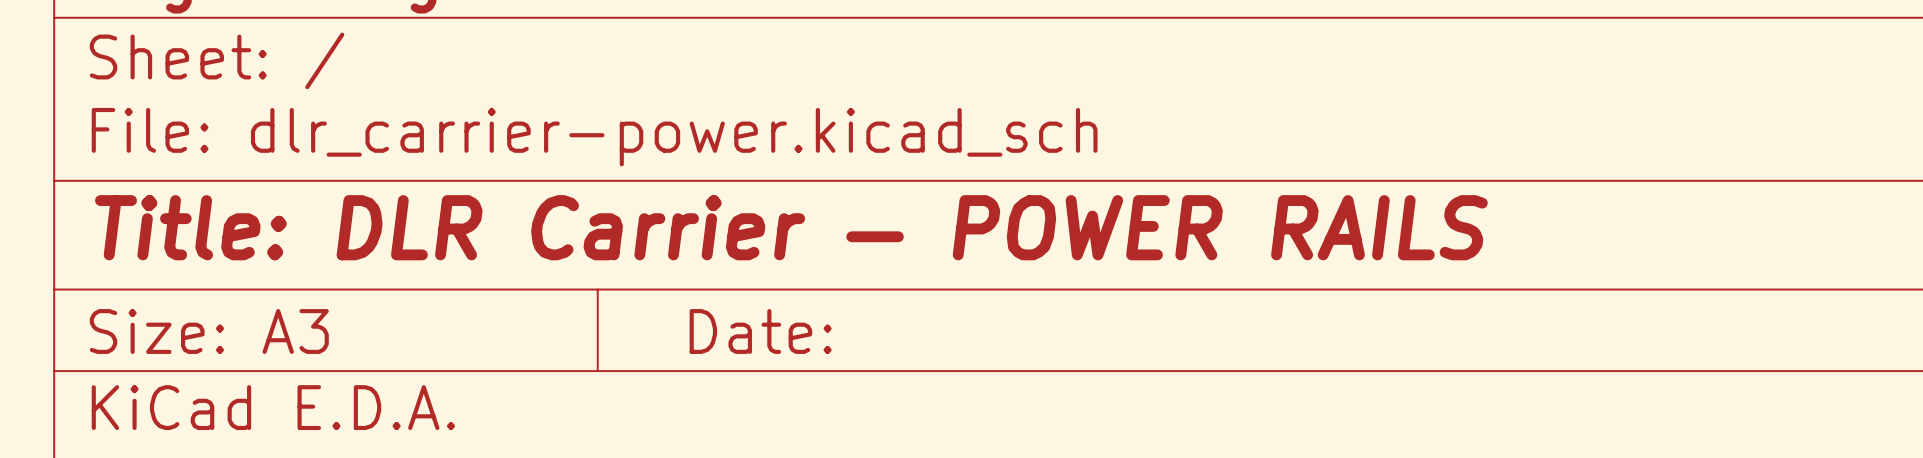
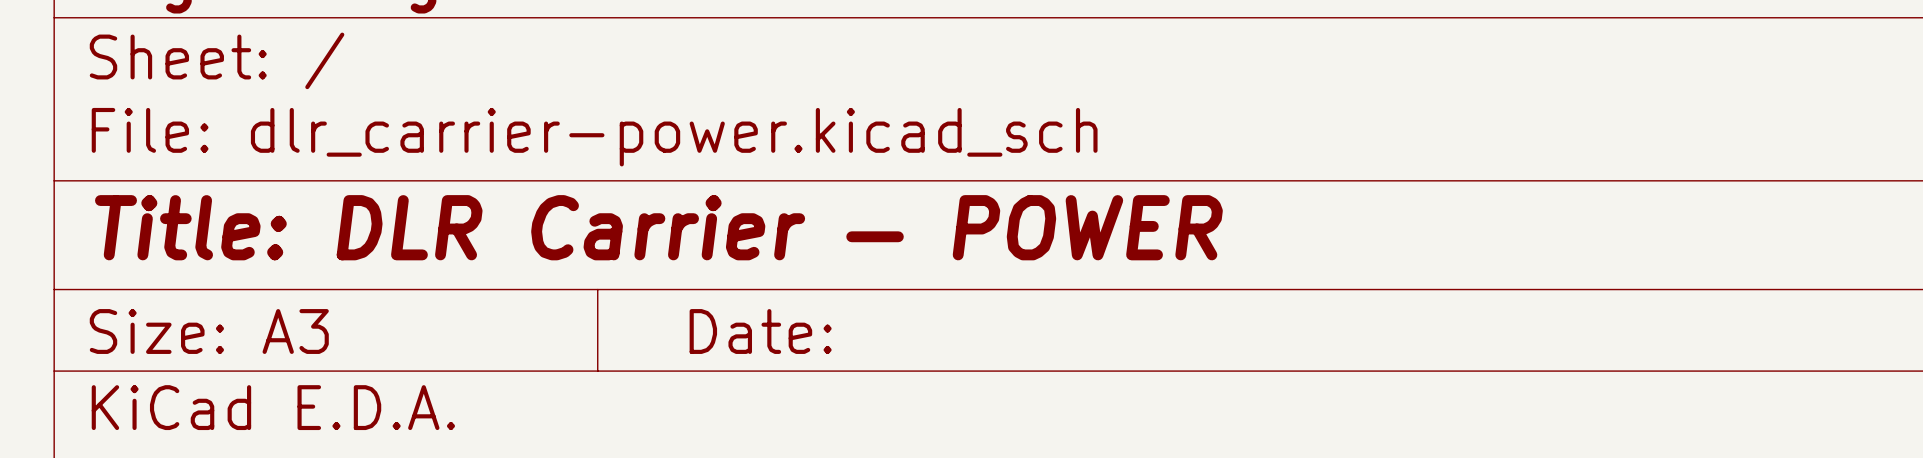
title block: Title: DLR Carrier — POWER RAILS (791, 227) -> Title: DLR Carrier — POWER (658, 227)

